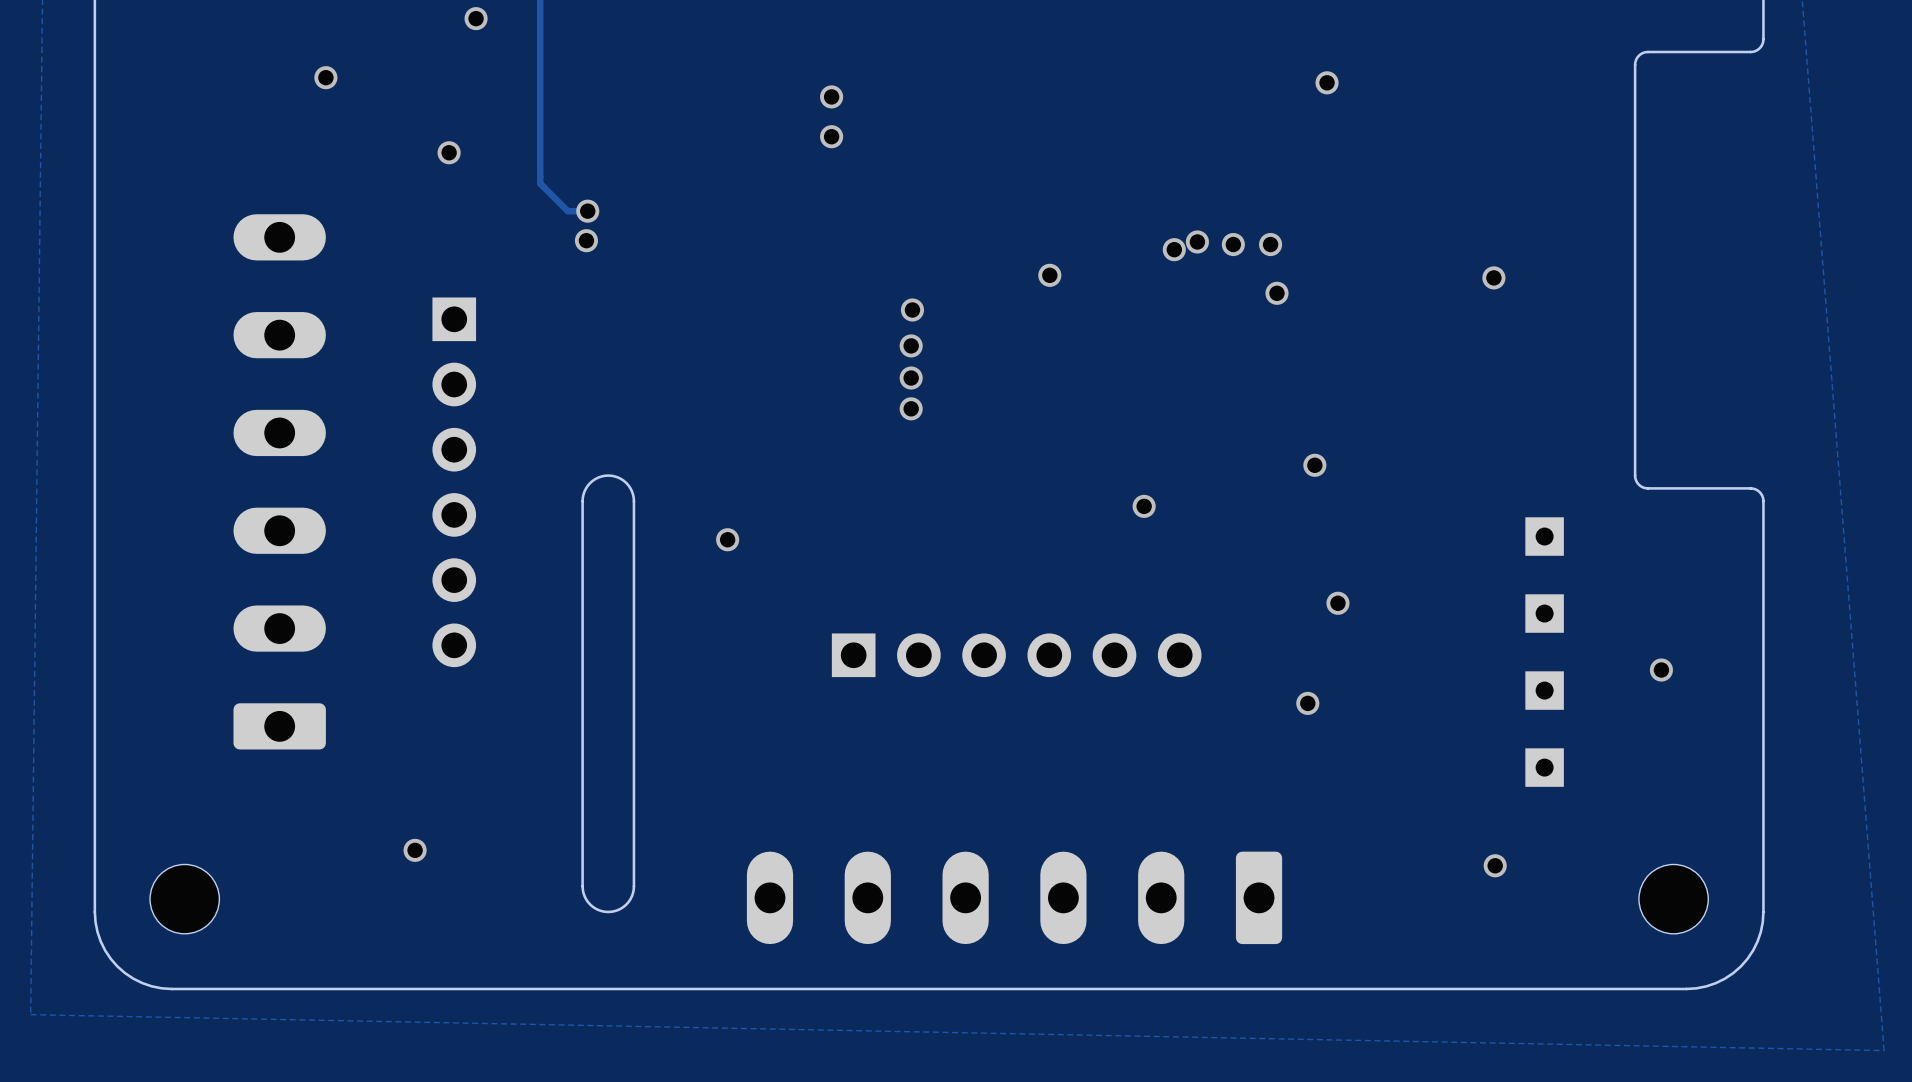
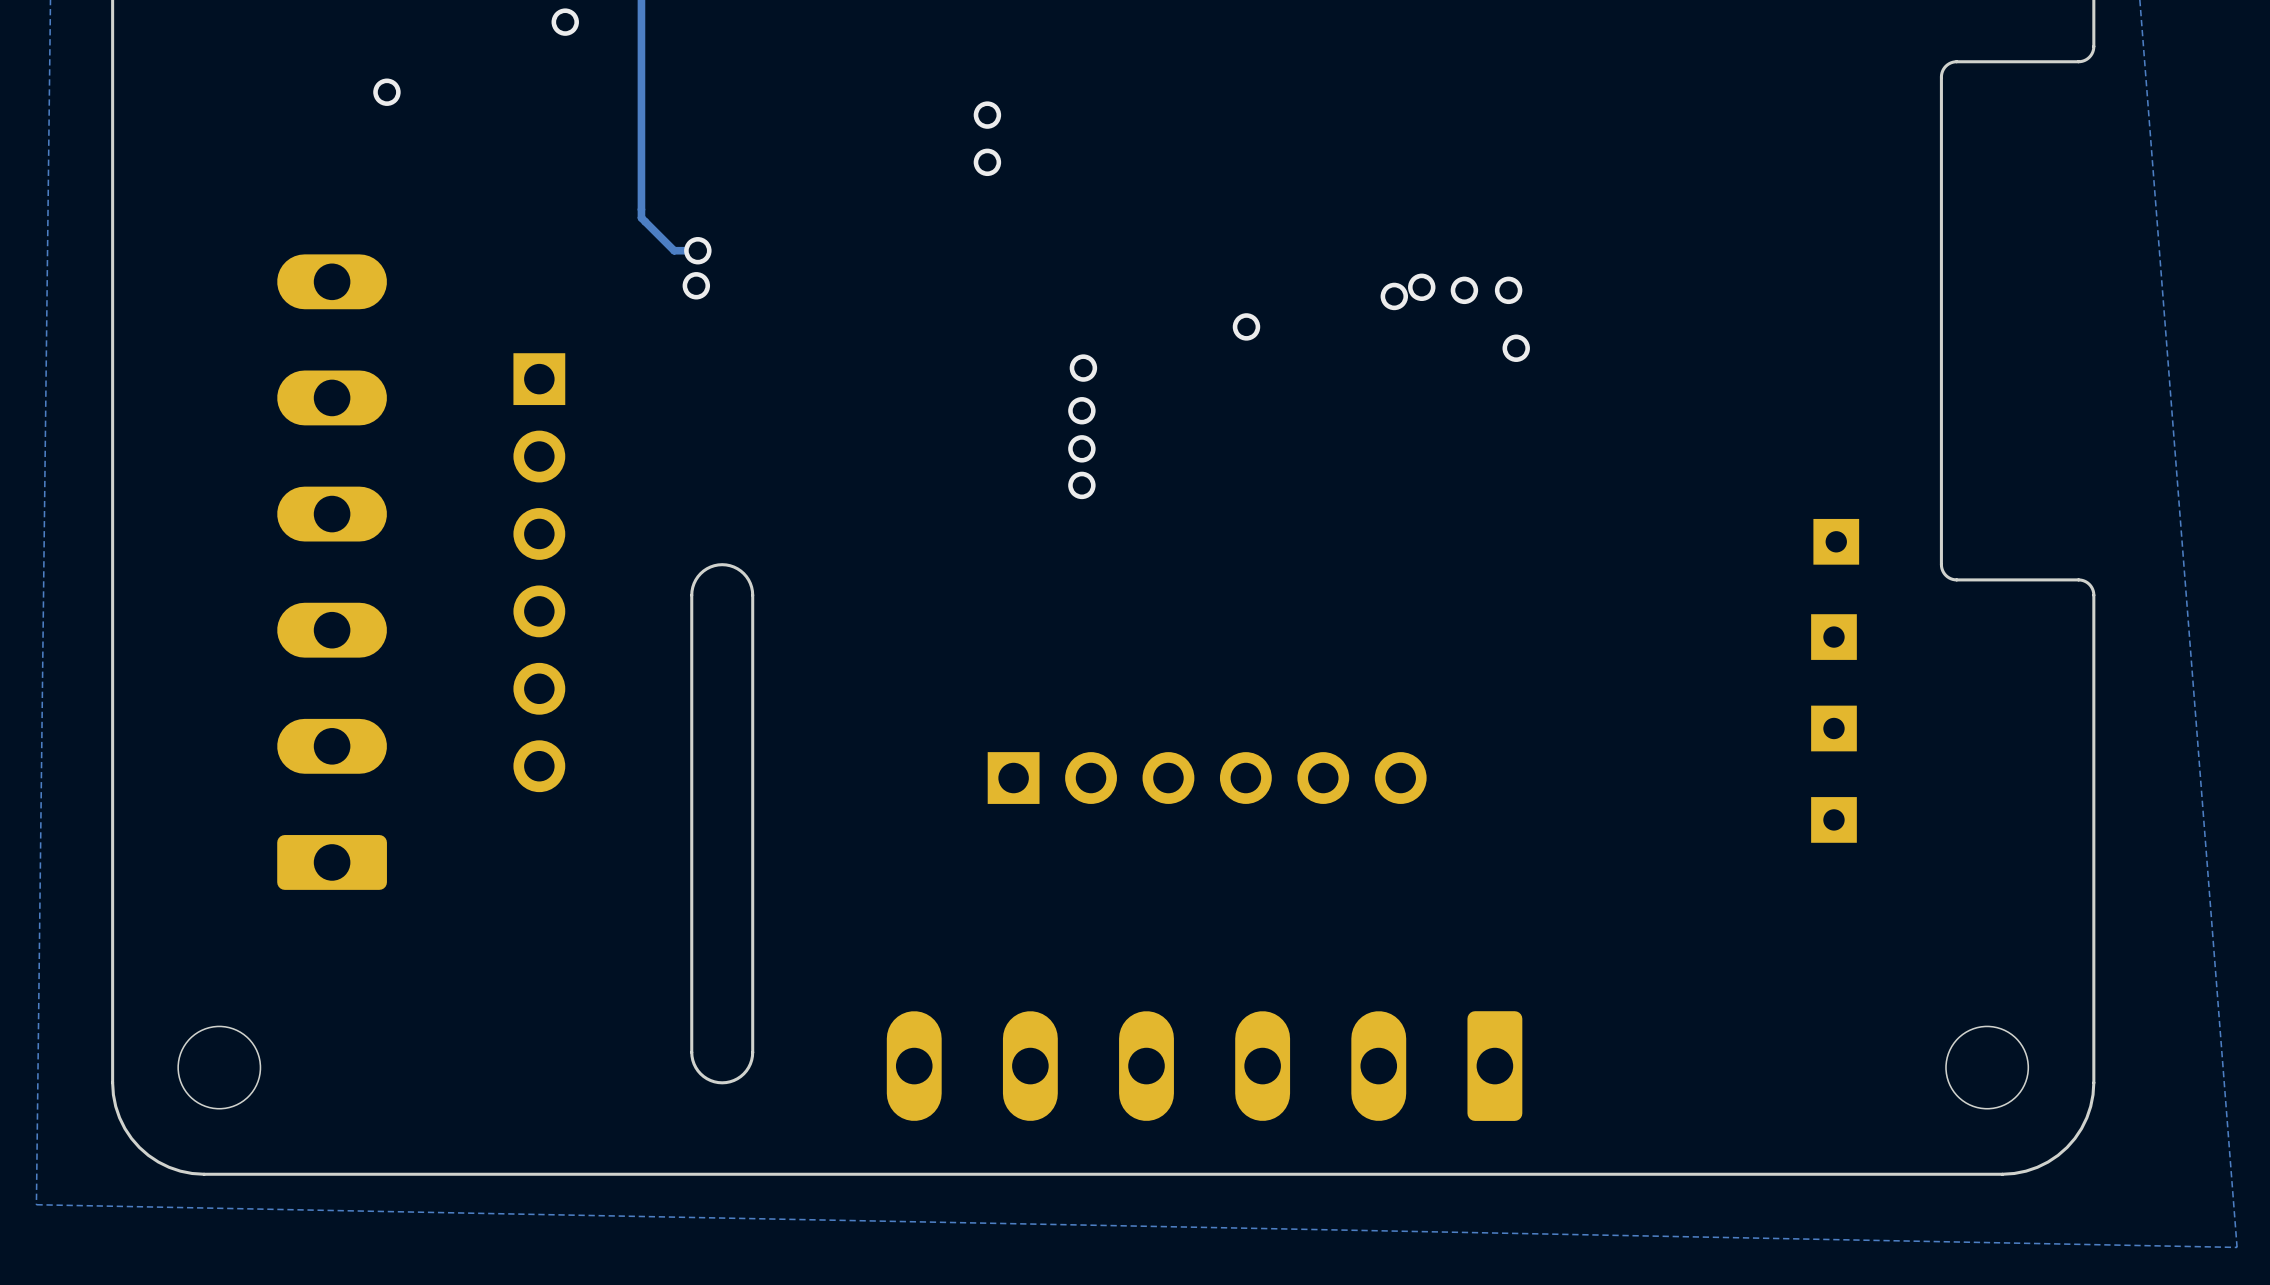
via: (1327, 82) -> none
via: (449, 152) -> none
via: (1493, 277) -> none
via: (1314, 465) -> none
via: (1144, 506) -> none
via: (727, 539) -> none
via: (1337, 603) -> none
via: (1661, 670) -> none
via: (1307, 703) -> none
part position: (1544, 767) -> (1836, 541)
via: (415, 850) -> none
via: (1495, 865) -> none

